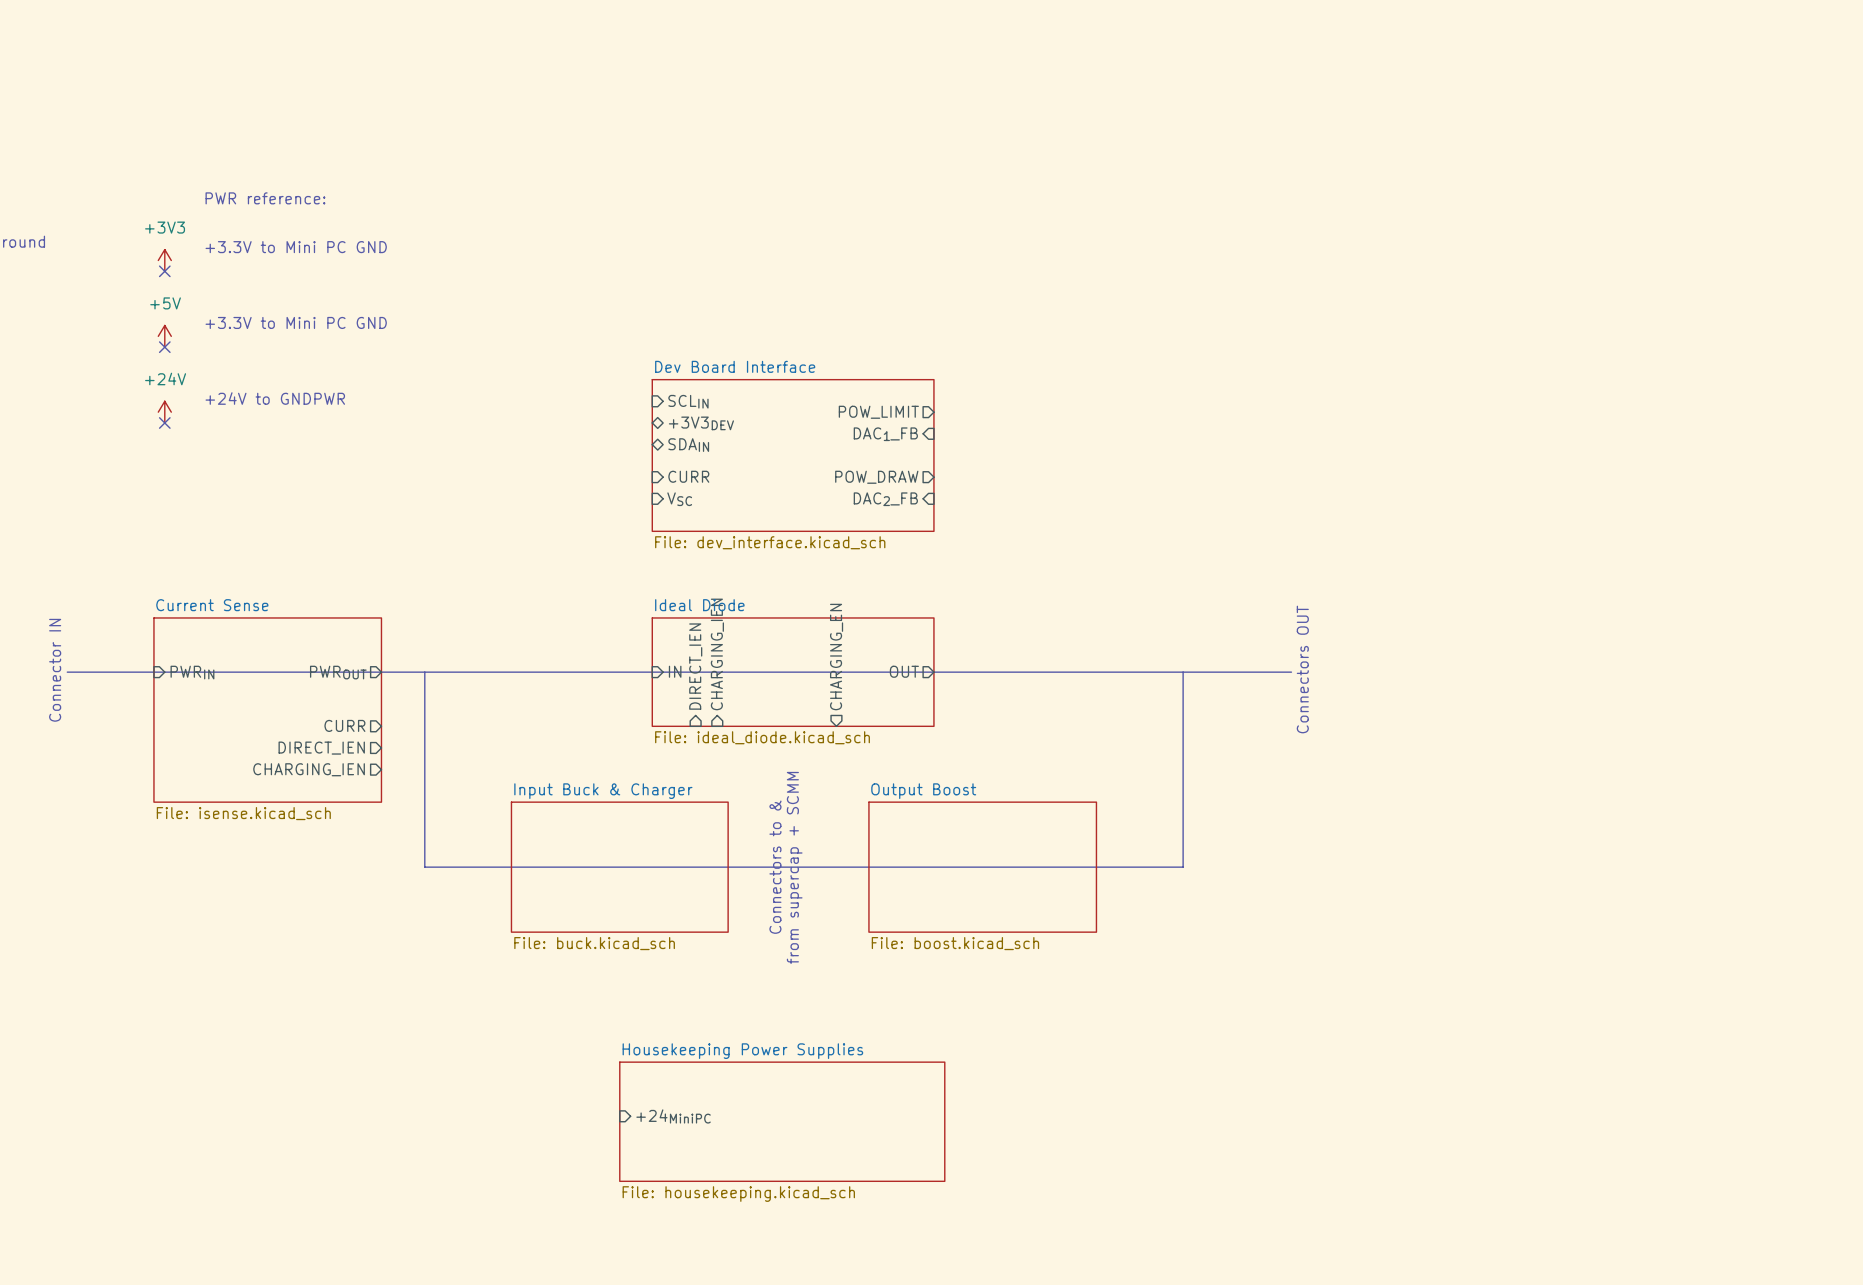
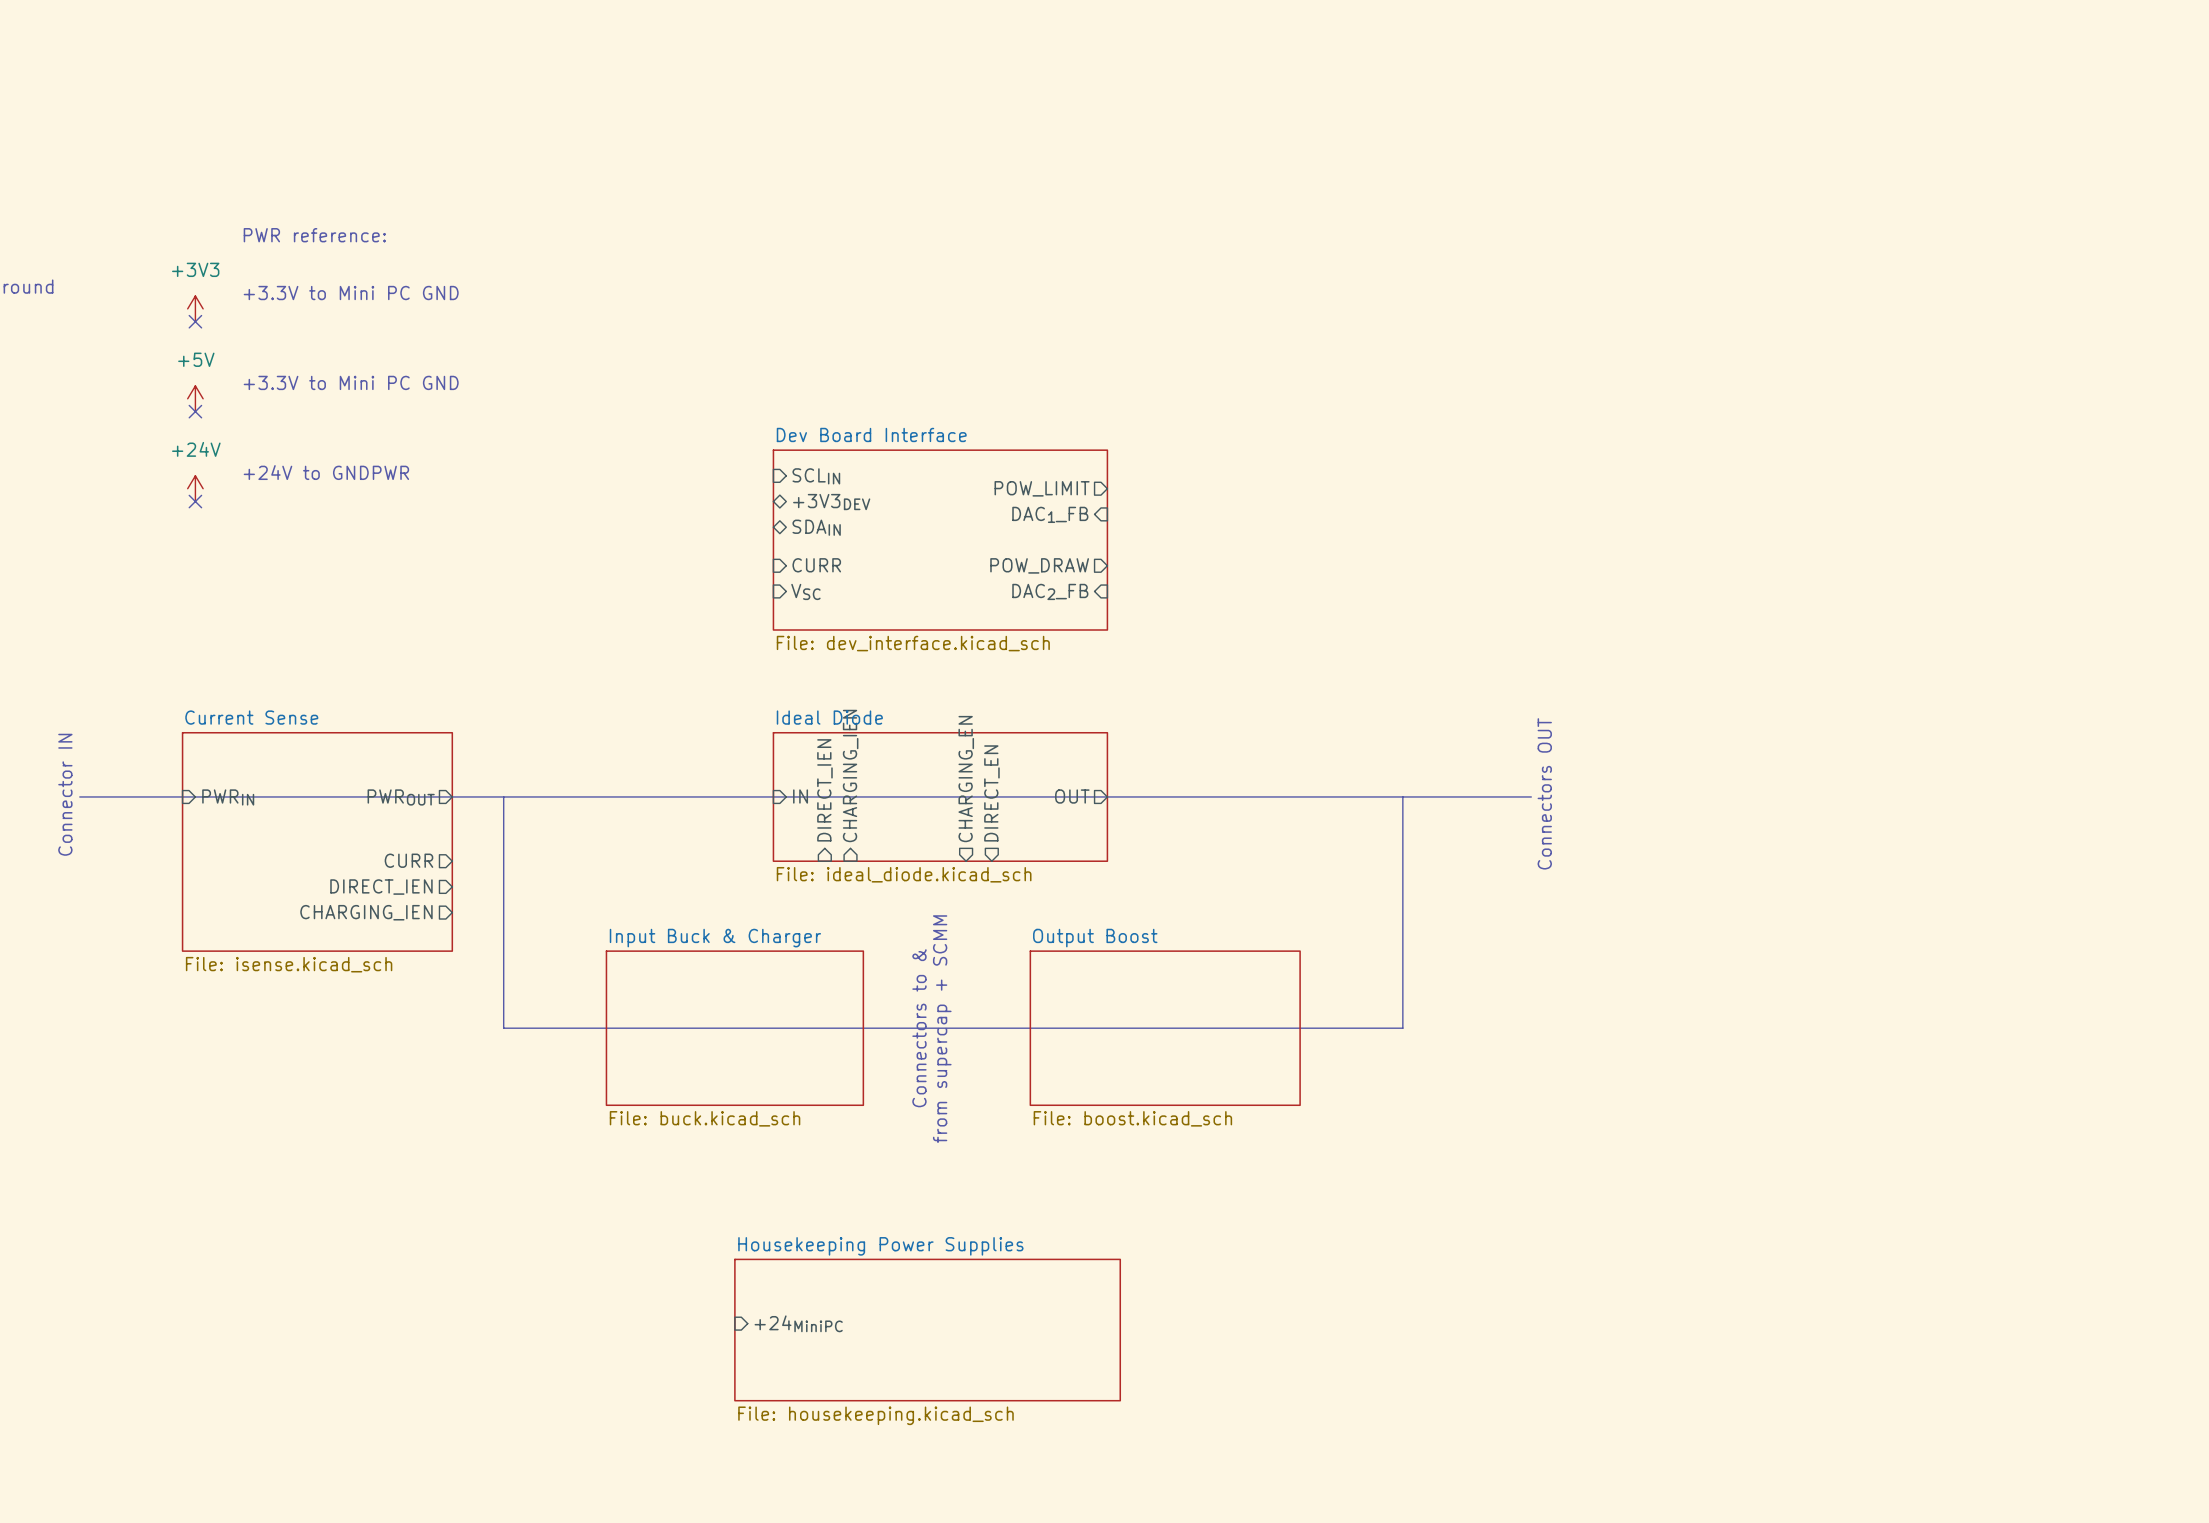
sheet pin: none -> CHARGING_EN (966, 779)
sheet pin: CHARGING_EN (836, 657) -> DIRECT_EN (991, 793)

